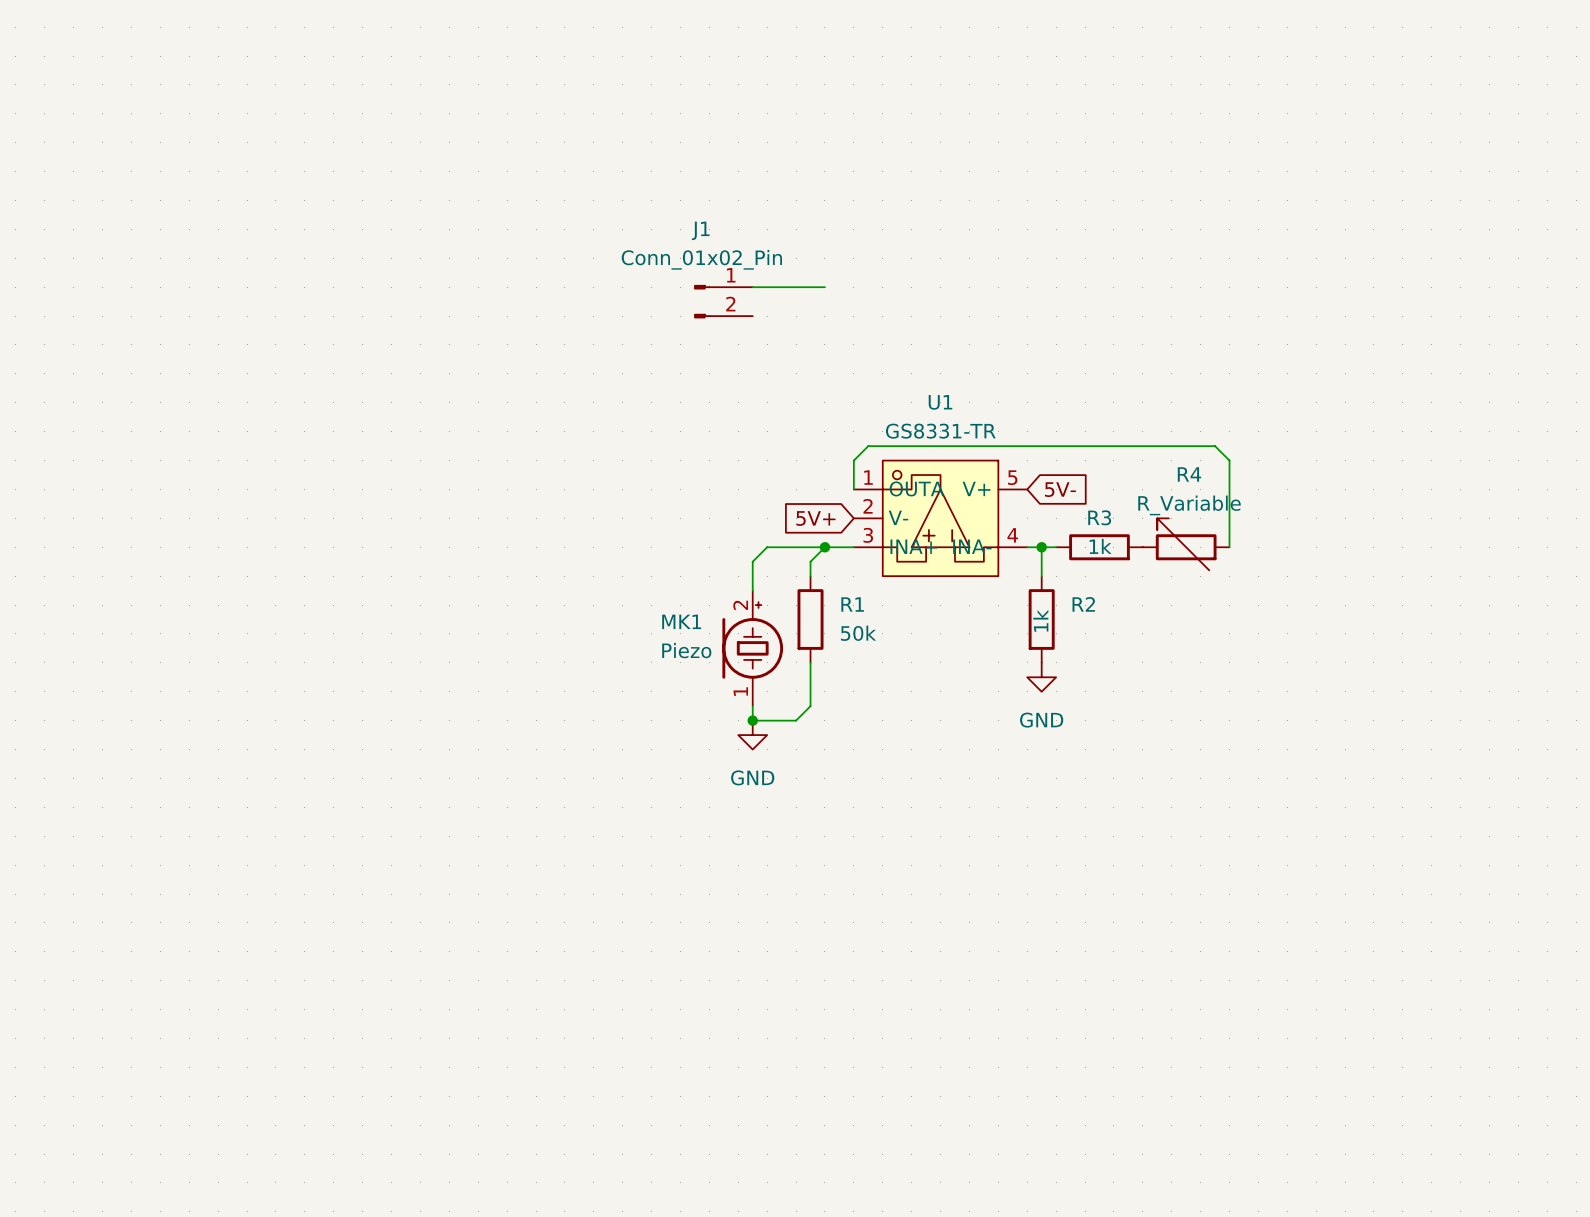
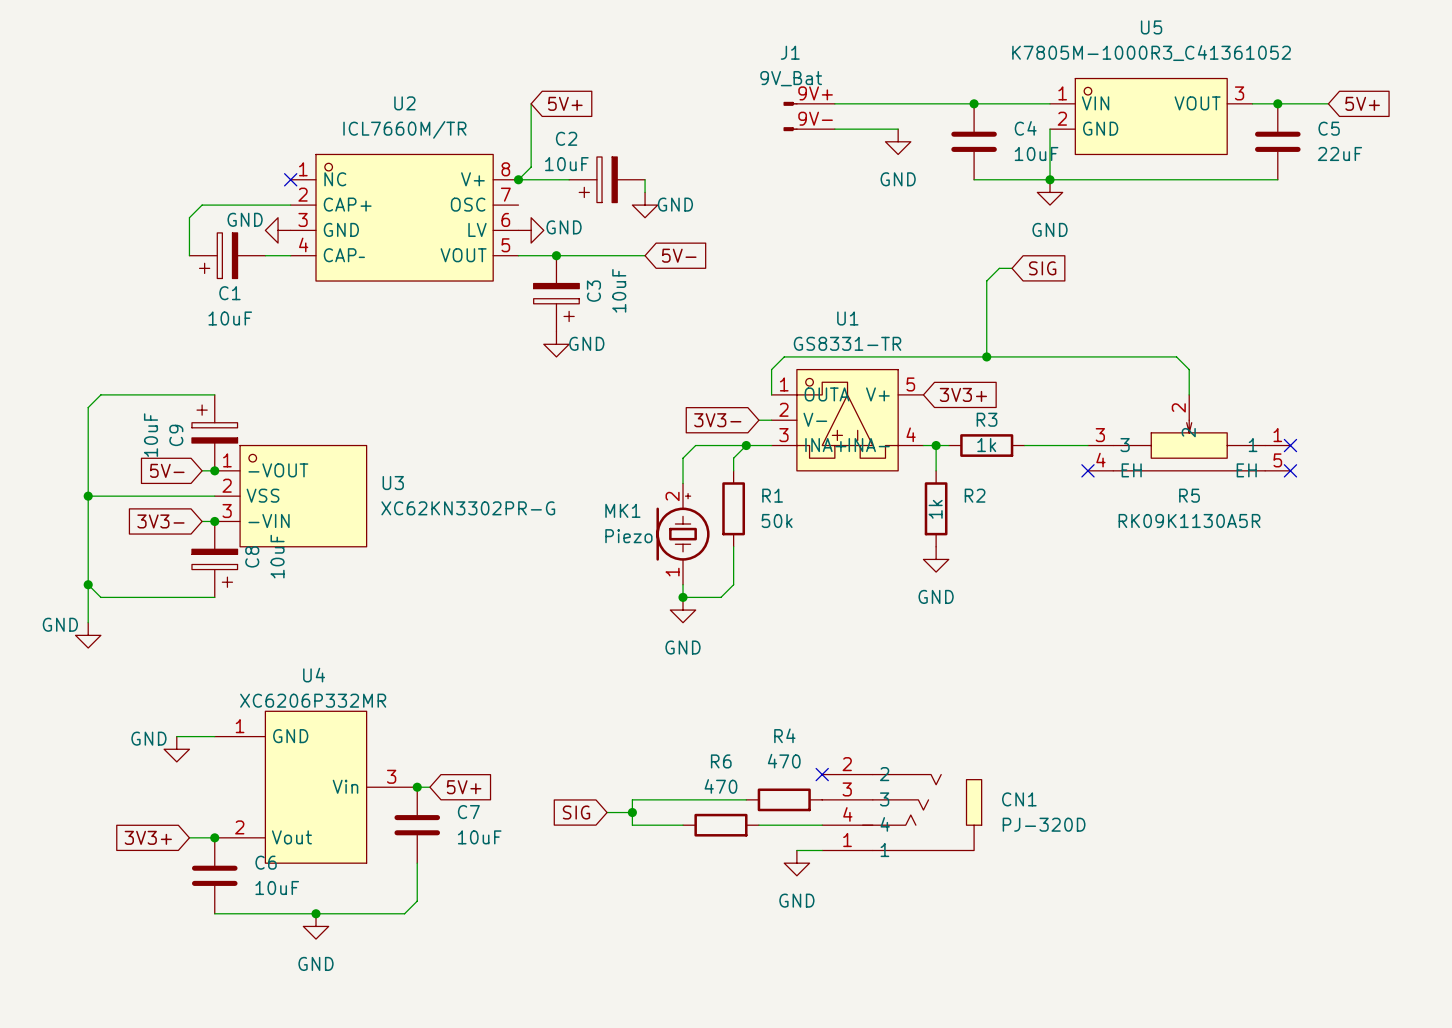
wire: none -> (531, 103) (531, 167) (518, 179) (569, 179)
global label: none -> 5V+ (565, 103)
wire: none -> (834, 103) (1050, 103)
junction: none -> (974, 103)
wire: none -> (1252, 103) (1328, 103)
junction: none -> (1277, 103)
global label: none -> 5V+ (1362, 103)
U5: none -> K7805M-1000R3_C41361052 (1151, 116)
wire: none -> (1050, 129) (1050, 179)
power symbol: none -> GND (898, 141)
C4: none -> 10uF (974, 141)
C5: none -> 22uF (1277, 141)
no-connect mark: none -> (290, 179)
junction: none -> (518, 179)
C2: none -> 10uF (607, 179)
wire: none -> (645, 179) (645, 192)
wire: none -> (974, 179) (1277, 179)
junction: none -> (1050, 179)
power symbol: none -> GND (1050, 192)
J1 value: Conn_01x02_Pin (701, 259) -> 9V_Bat (791, 78)
wire: none -> (290, 205) (202, 205) (189, 217) (189, 255)
power symbol: none -> GND (645, 205)
J1 pin number: 1 (731, 275) -> 9V+ (815, 93)
U2: none -> ICL7660M/TR (404, 217)
wire: (752, 287) (824, 287) -> (834, 129) (898, 129)
power symbol: none -> GND (278, 230)
power symbol: none -> GND (531, 230)
J1 position: (723, 301) -> (809, 116)
J1 pin number: 2 (730, 304) -> 9V- (815, 118)
C1: none -> 10uF (227, 255)
wire: none -> (265, 255) (290, 255)
wire: none -> (518, 255) (645, 255)
junction: none -> (556, 255)
global label: none -> 5V- (679, 255)
wire: none -> (1012, 268) (999, 268) (986, 281) (986, 356)
global label: none -> SIG (1042, 268)
C3: none -> 10uF (556, 293)
power symbol: none -> GND (556, 344)
junction: none -> (986, 356)
wire: (1215, 446) (1229, 460) (1229, 547) -> (1087, 356) (1176, 356) (1189, 369) (1189, 394)
wire: none -> (214, 394) (100, 394) (88, 407) (88, 622)
global label: 5V- (1060, 489) -> 3V3+ (963, 394)
R4 value: R_Variable (1189, 505) -> 470 (784, 761)
global label: none -> 3V3- (717, 420)
global label: 5V+ (815, 518) -> none
wire: none -> (758, 420) (771, 420)
R4 symbol: [1142, 518, 1230, 571] -> [746, 788, 823, 812]
C9: none -> 10uF (214, 432)
R5: none -> RK09K1130A5R (1189, 432)
wire: none -> (1024, 445) (1087, 445)
no-connect mark: none -> (1290, 445)
global label: none -> 5V- (167, 470)
wire: none -> (202, 470) (214, 470)
junction: none -> (214, 470)
no-connect mark: none -> (1087, 470)
no-connect mark: none -> (1290, 470)
wire: none -> (88, 496) (214, 496)
junction: none -> (88, 496)
U3: none -> XC62KN3302PR-G (290, 496)
global label: none -> 3V3- (160, 521)
wire: none -> (202, 521) (214, 521)
junction: none -> (214, 521)
C8: none -> 10uF (214, 559)
wire: none -> (88, 584) (100, 597) (214, 597)
junction: none -> (88, 584)
power symbol: none -> GND (88, 635)
wire: none -> (176, 736) (214, 736)
power symbol: none -> GND (176, 749)
no-connect mark: none -> (822, 774)
U4: none -> XC6206P332MR (316, 787)
wire: none -> (417, 787) (429, 787)
junction: none -> (417, 787)
global label: none -> 5V+ (464, 787)
wire: none -> (746, 799) (632, 799) (632, 825) (683, 825)
global label: none -> SIG (576, 812)
wire: none -> (607, 812) (632, 812)
junction: none -> (632, 812)
CN1: none -> PJ-320D (901, 812)
C7: none -> 10uF (417, 825)
R6: none -> 470 (720, 825)
wire: none -> (758, 825) (822, 825)
global label: none -> 3V3+ (148, 837)
wire: none -> (189, 837) (214, 837)
junction: none -> (214, 837)
wire: none -> (796, 850) (822, 850)
wire: none -> (417, 863) (417, 901) (404, 913) (214, 913)
power symbol: none -> GND (796, 863)
C6: none -> 10uF (214, 875)
junction: none -> (316, 913)
power symbol: none -> GND (316, 926)

